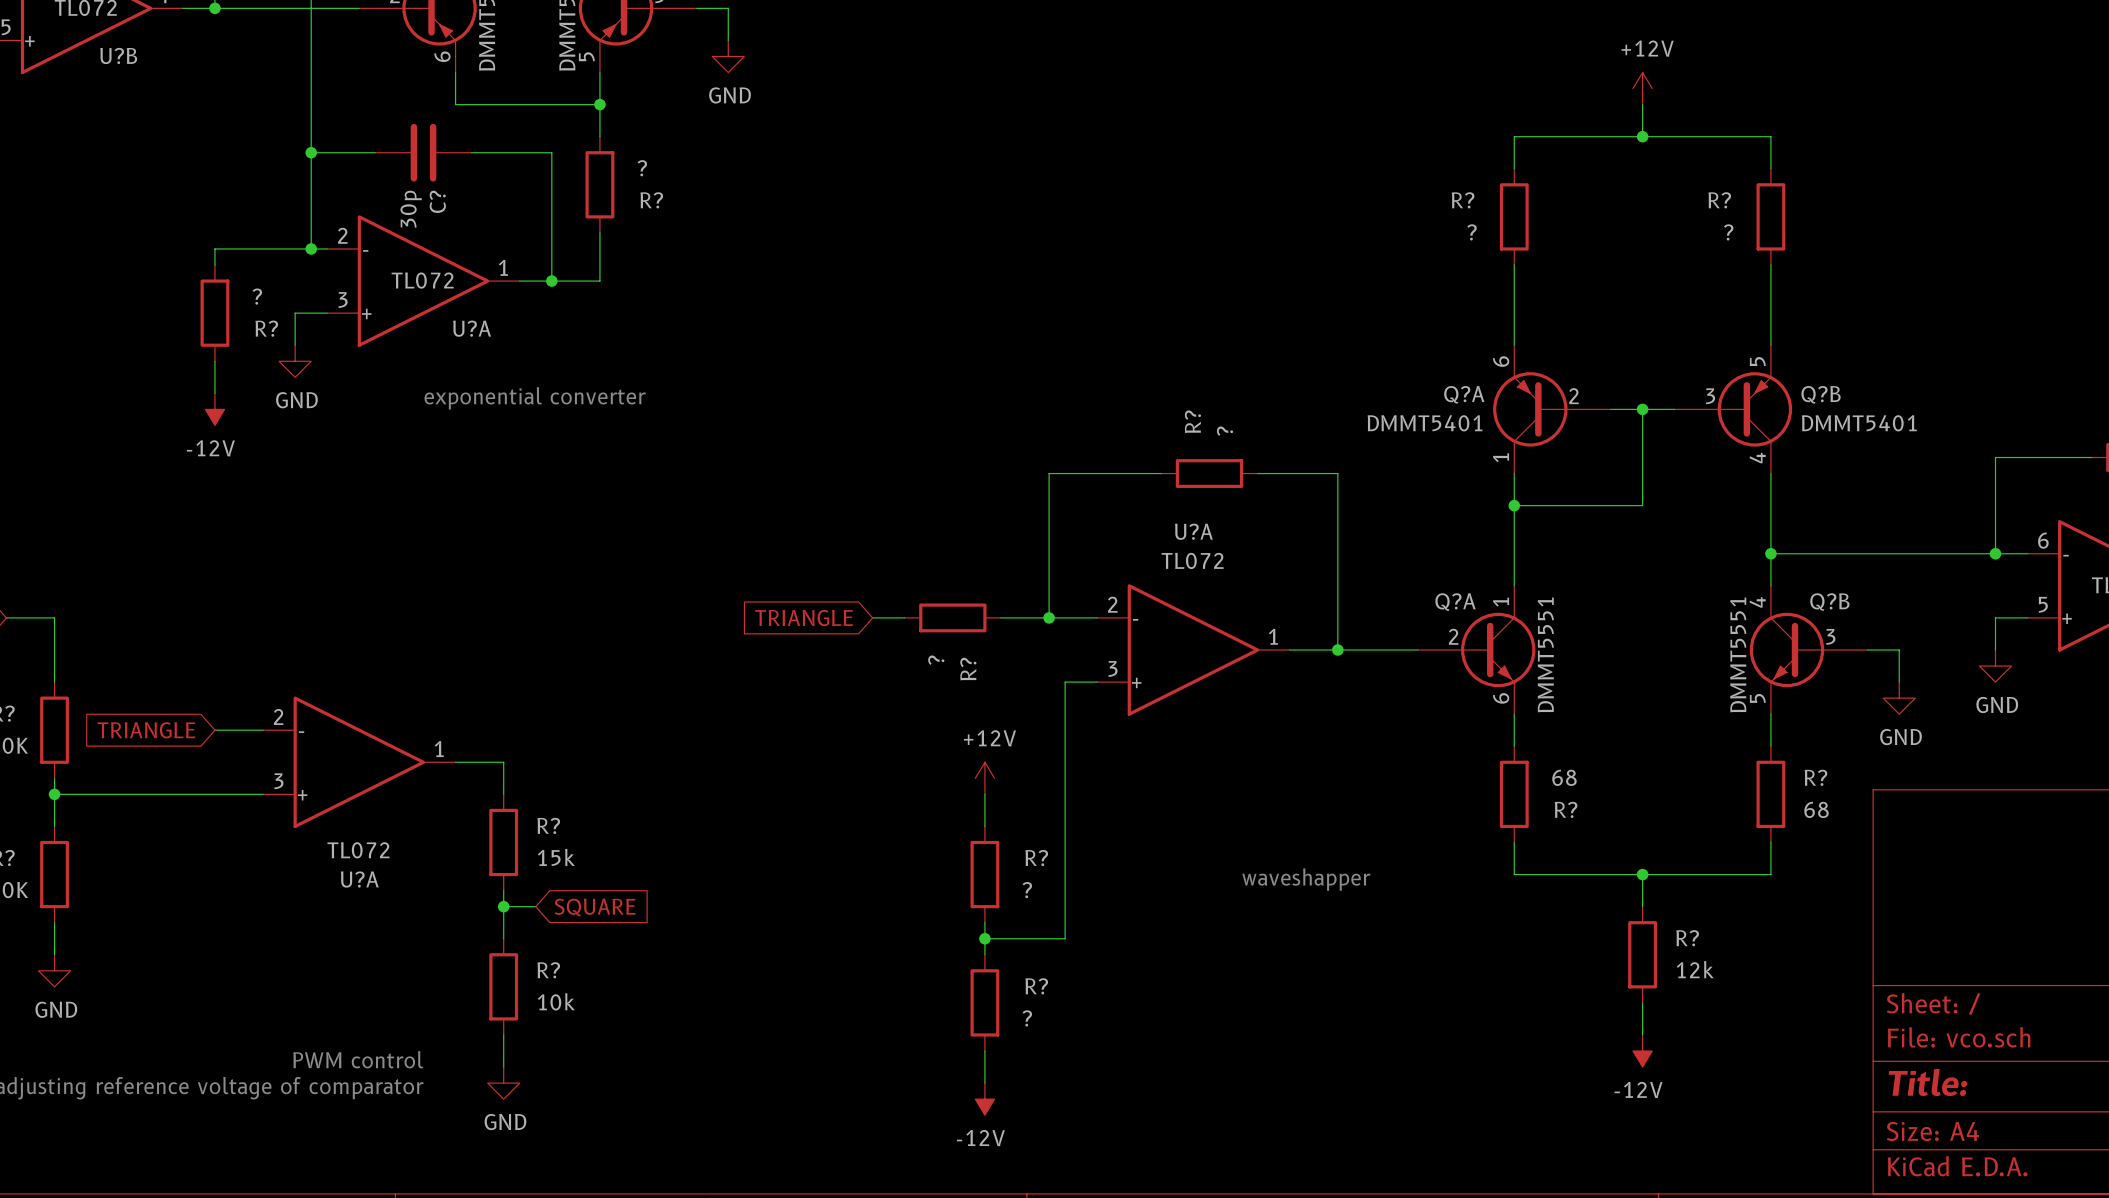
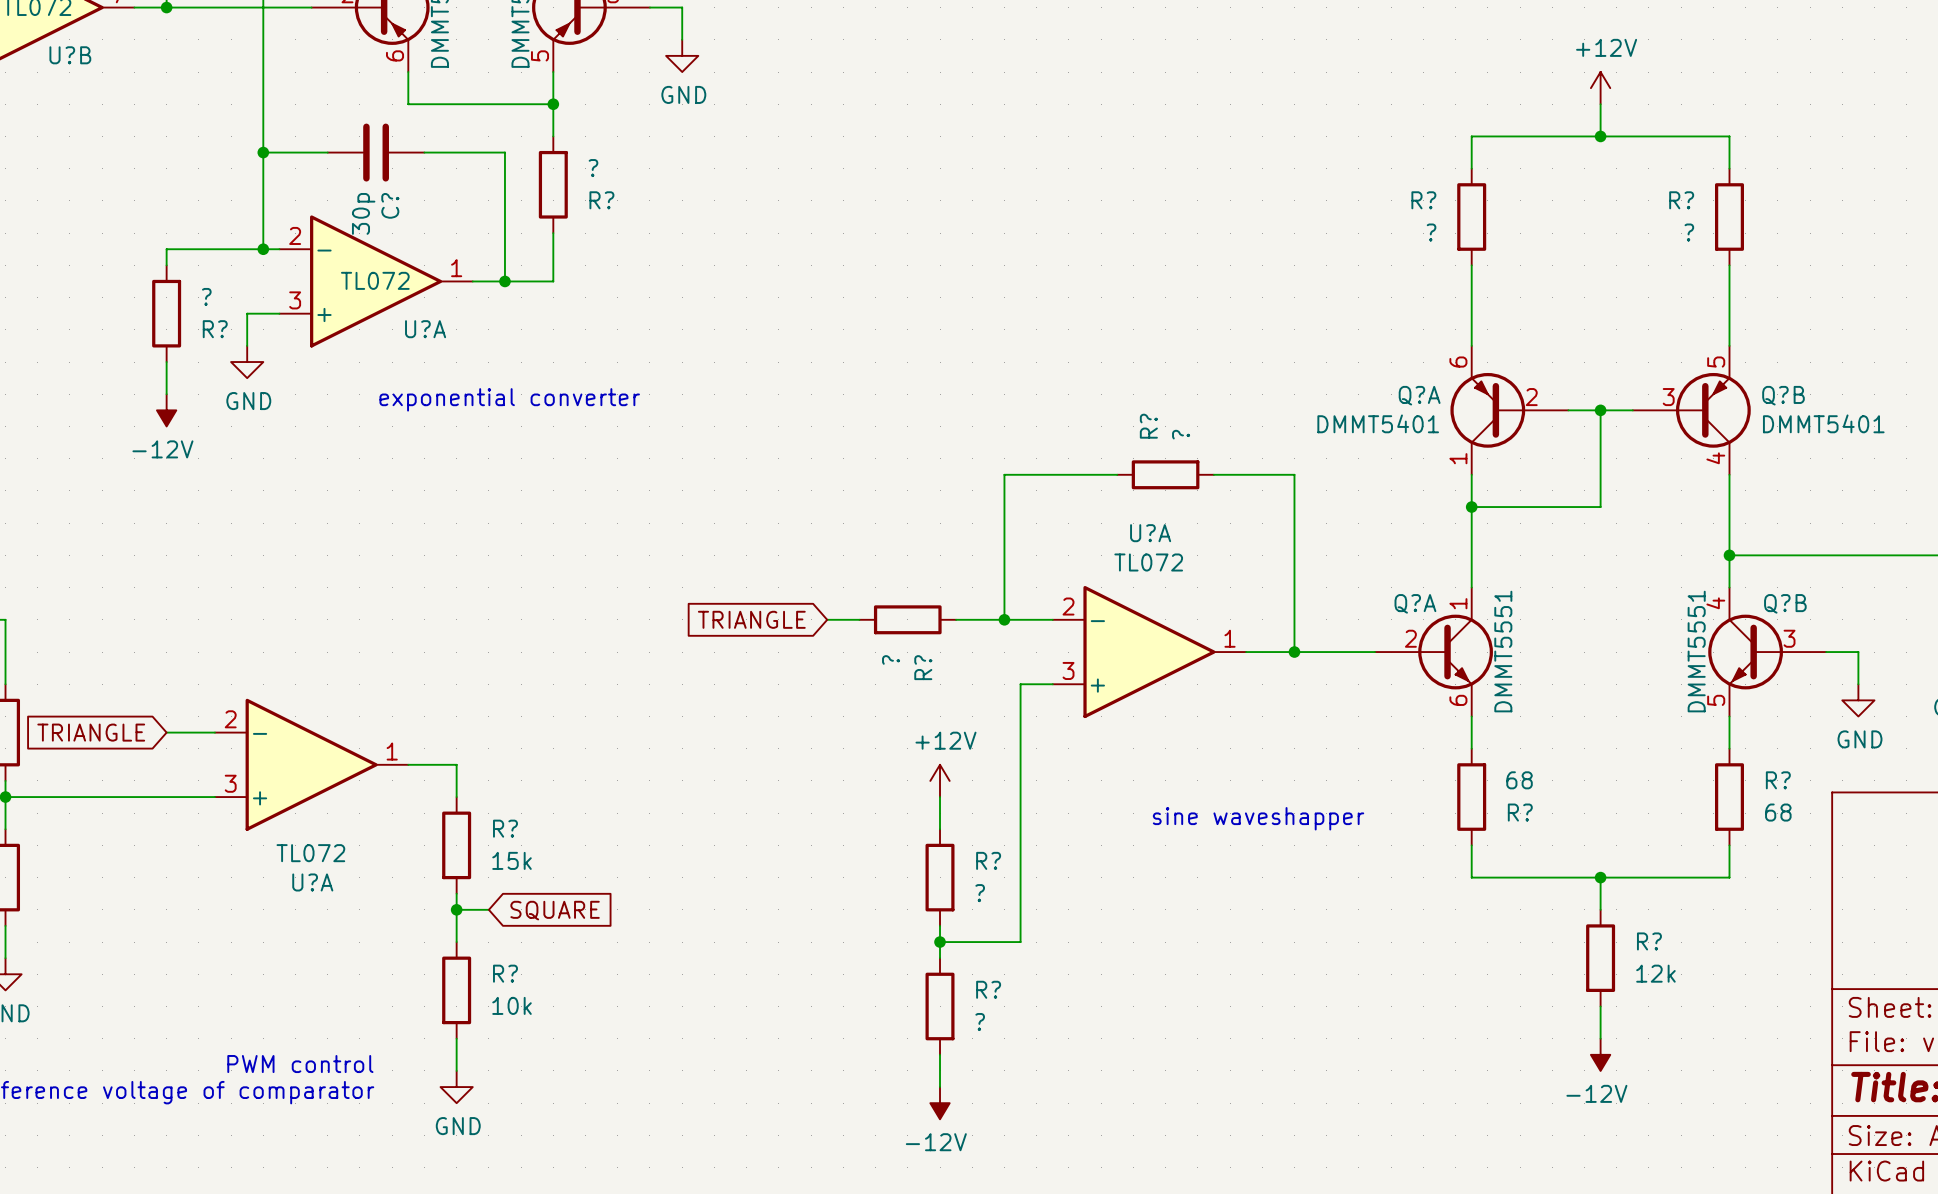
text: none -> sine waveshapper (1258, 818)
text: waveshapper (1306, 879) -> none

